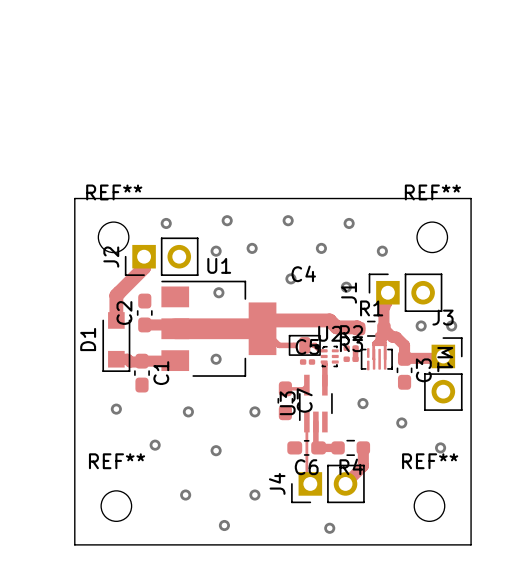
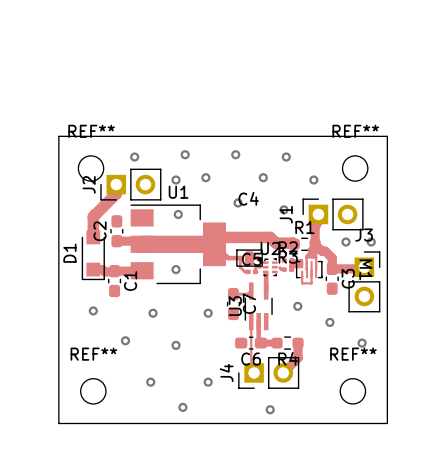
track: none -> (240, 258) (240, 267) (247, 271)
track: none -> (302, 264) (302, 260) (291, 260) (301, 263) (300, 266) (291, 266) (294, 263) (300, 264)
track: none -> (261, 267) (256, 267) (255, 271)
track: none -> (279, 267) (284, 269)
track: none -> (311, 269) (311, 283) (302, 283) (302, 274)

